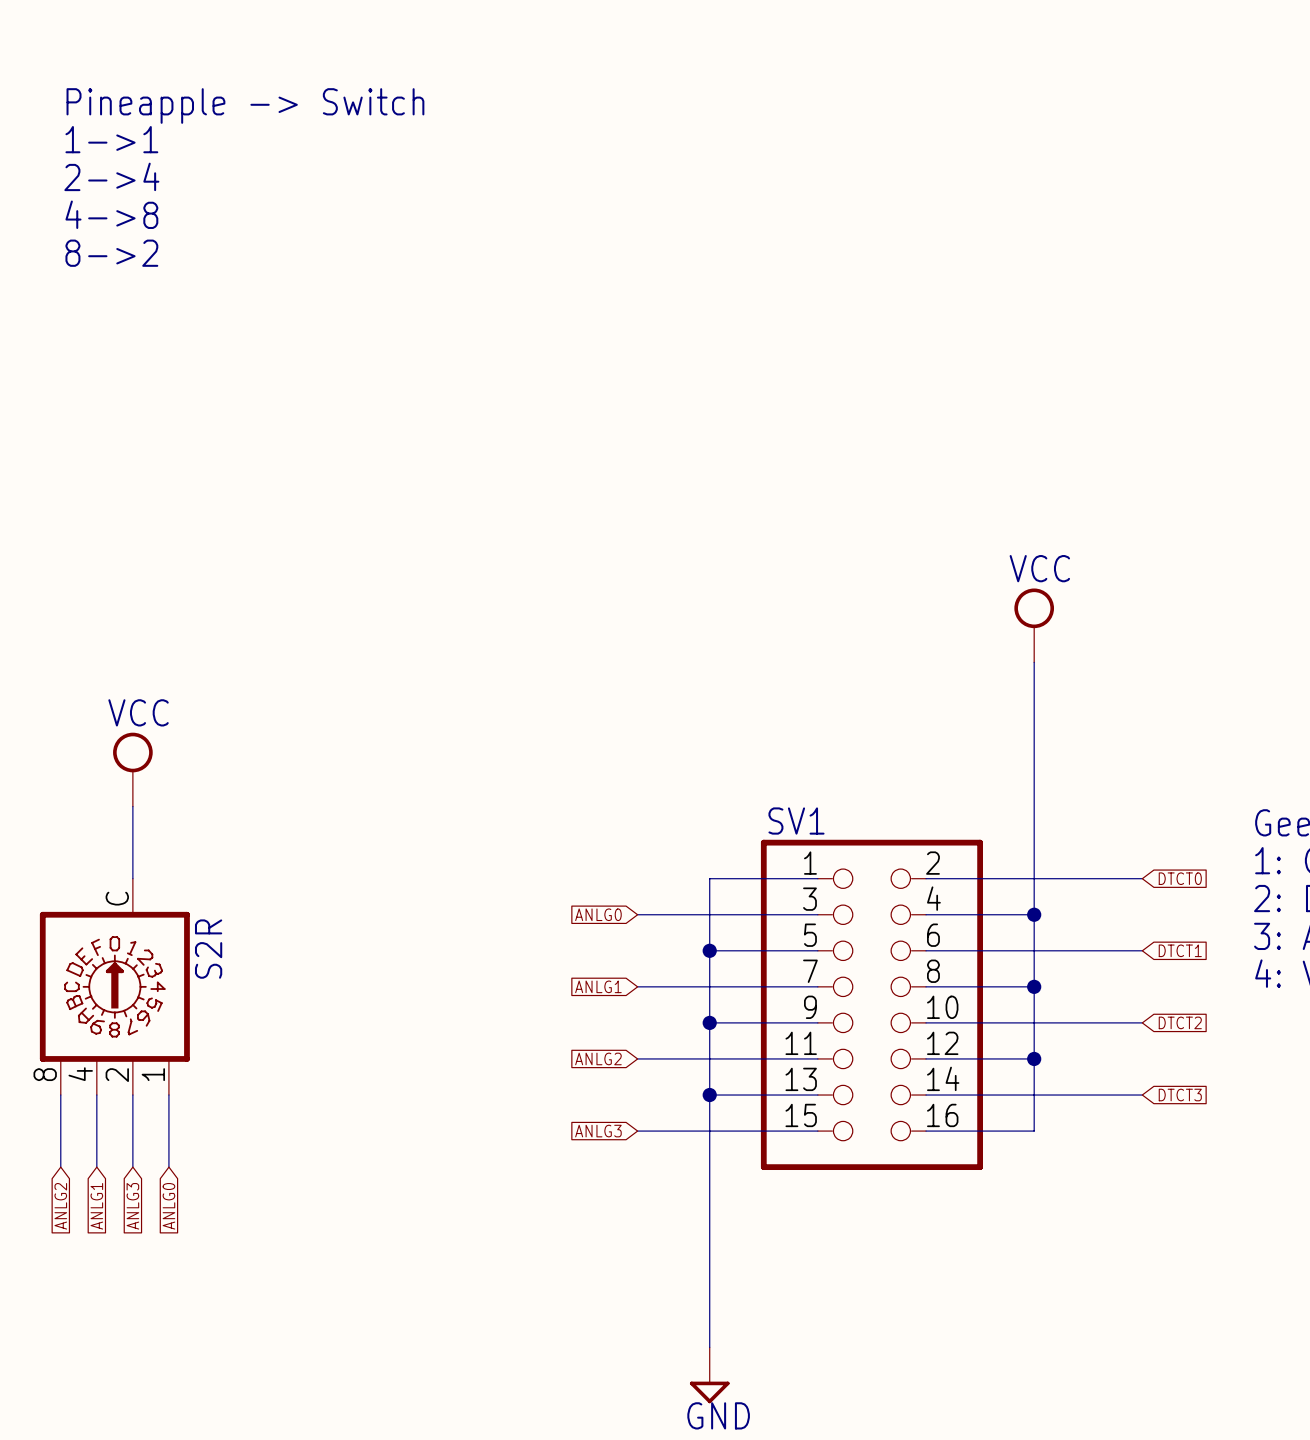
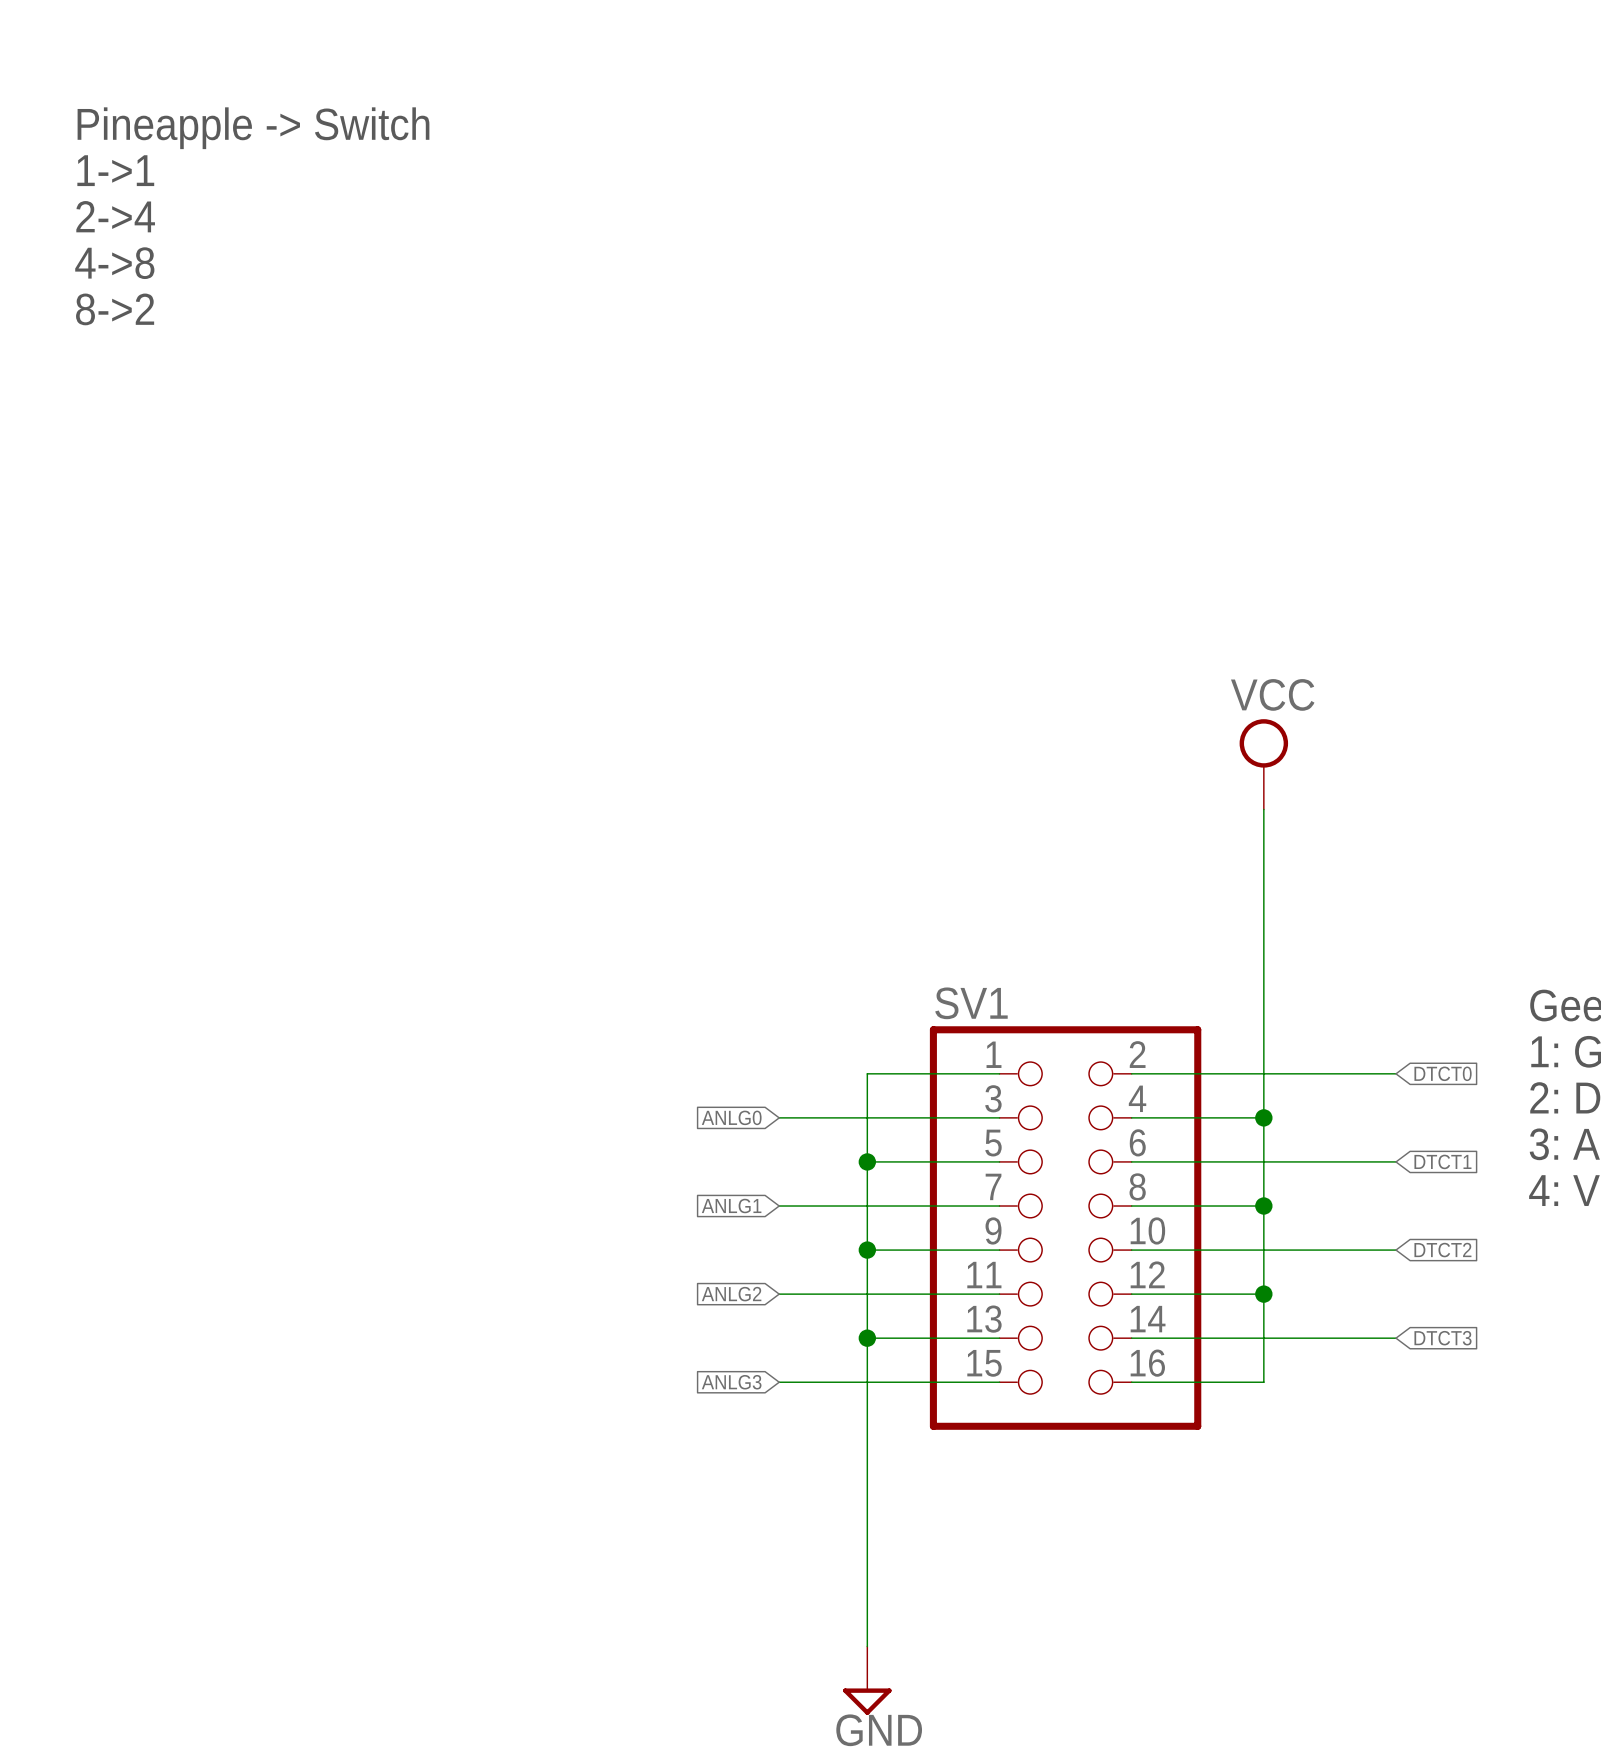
power symbol: VCC (132, 769) -> none
wire: (132, 806) (132, 878) -> none
S2R: (114, 986) -> none
wire: (60, 1095) (60, 1167) -> none
wire: (96, 1095) (96, 1167) -> none
wire: (132, 1095) (132, 1167) -> none
wire: (168, 1095) (168, 1167) -> none
global label: ANLG2 (60, 1206) -> none
global label: ANLG1 (96, 1206) -> none
global label: ANLG3 (132, 1206) -> none
global label: ANLG0 (168, 1206) -> none

